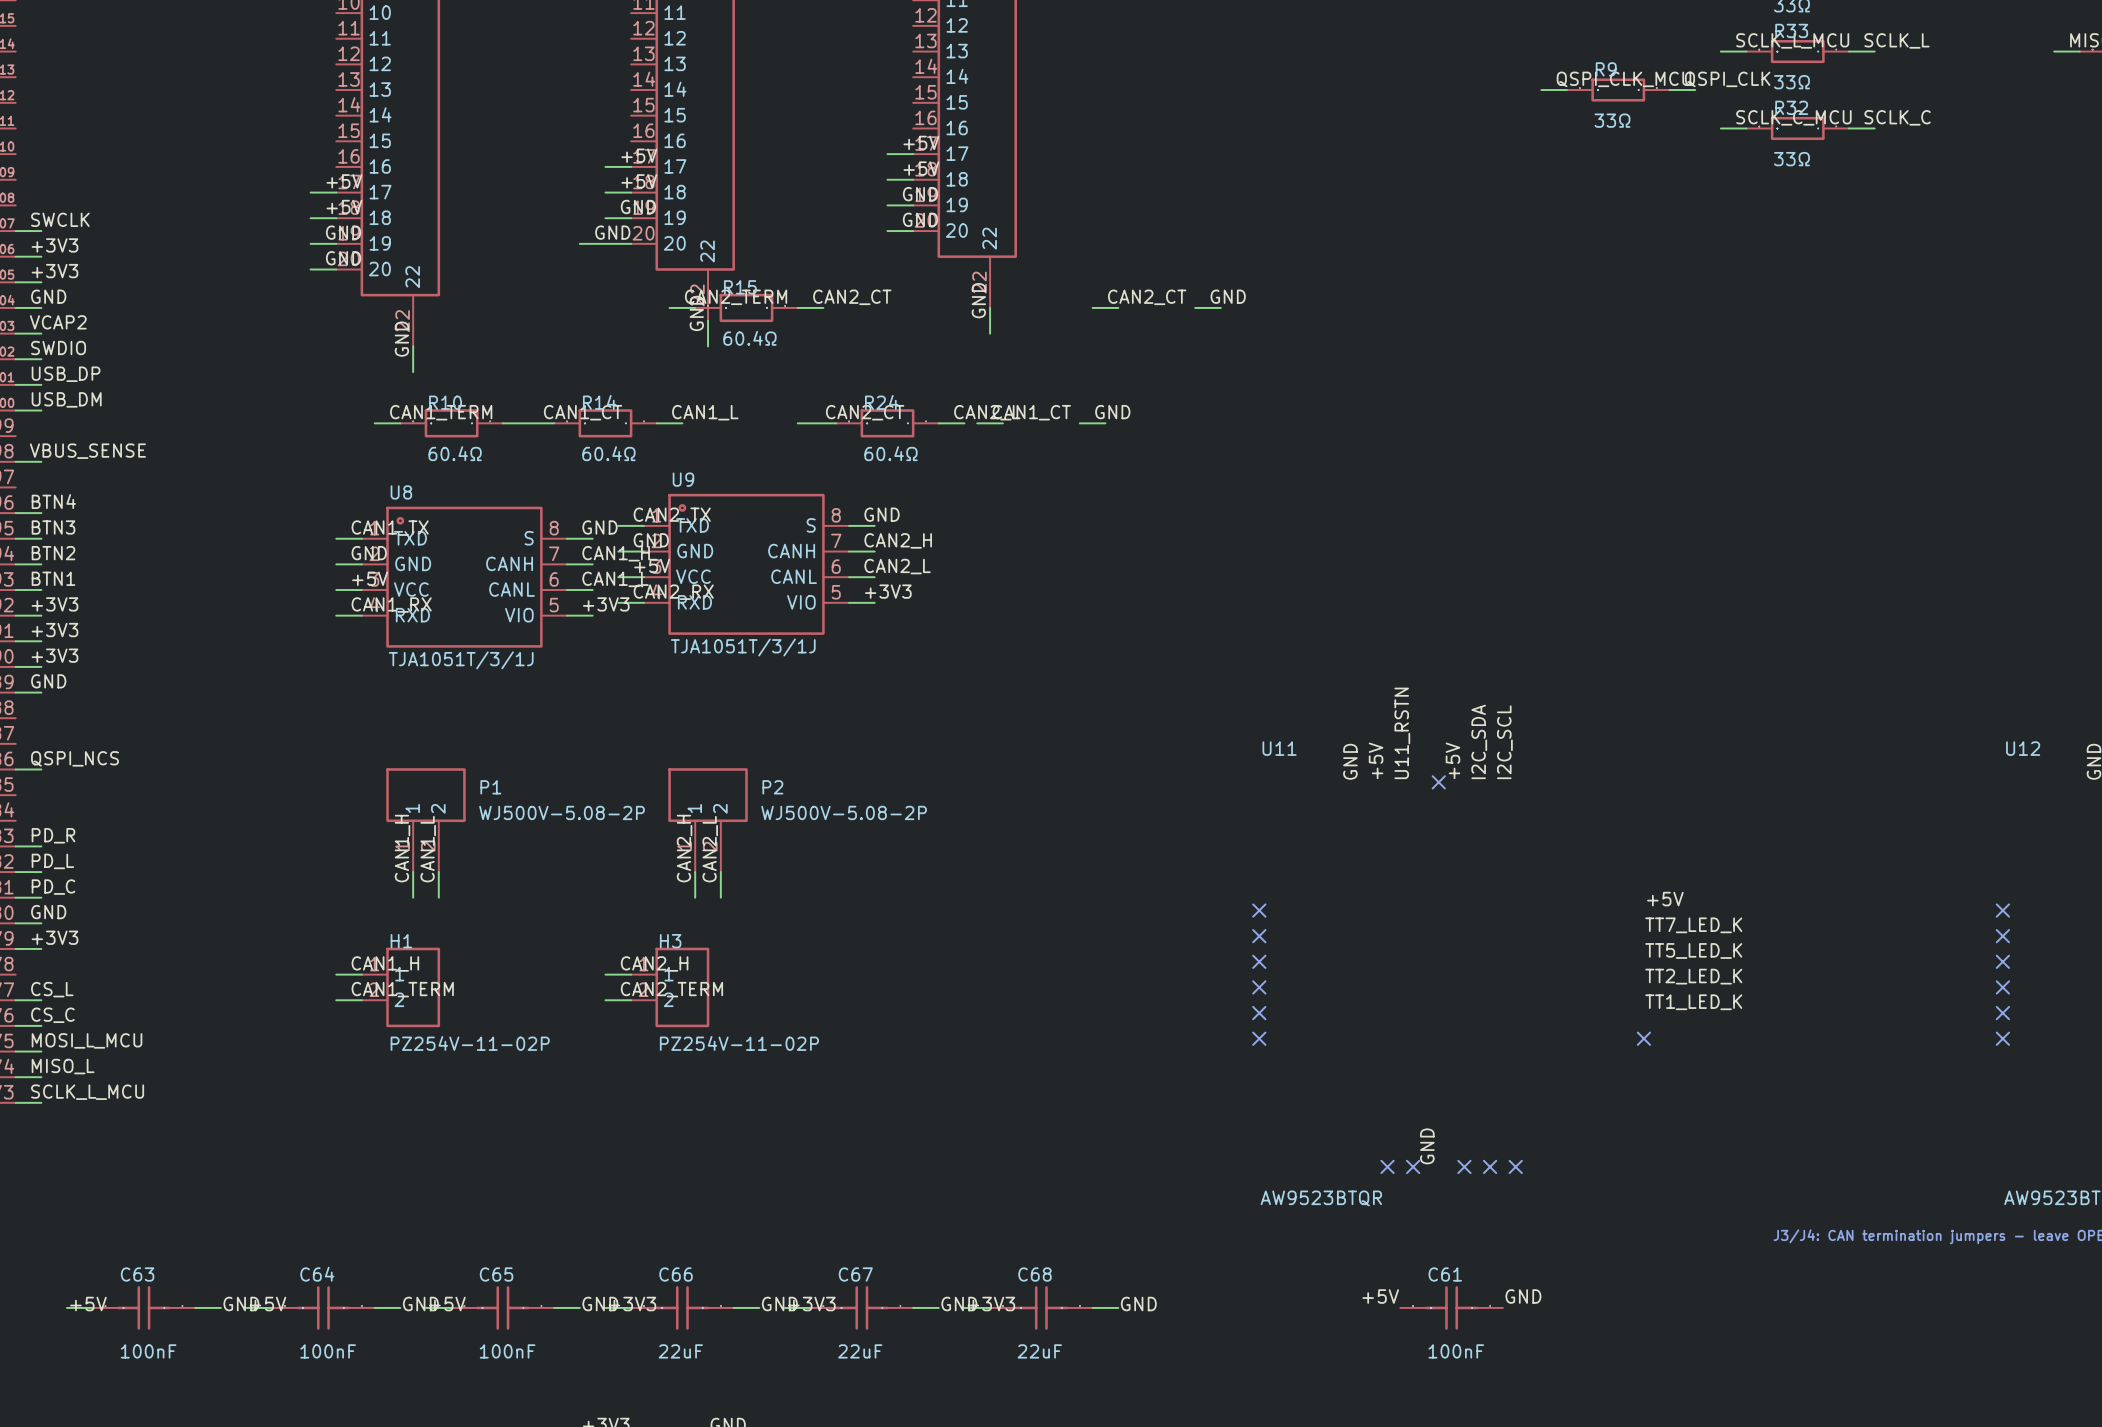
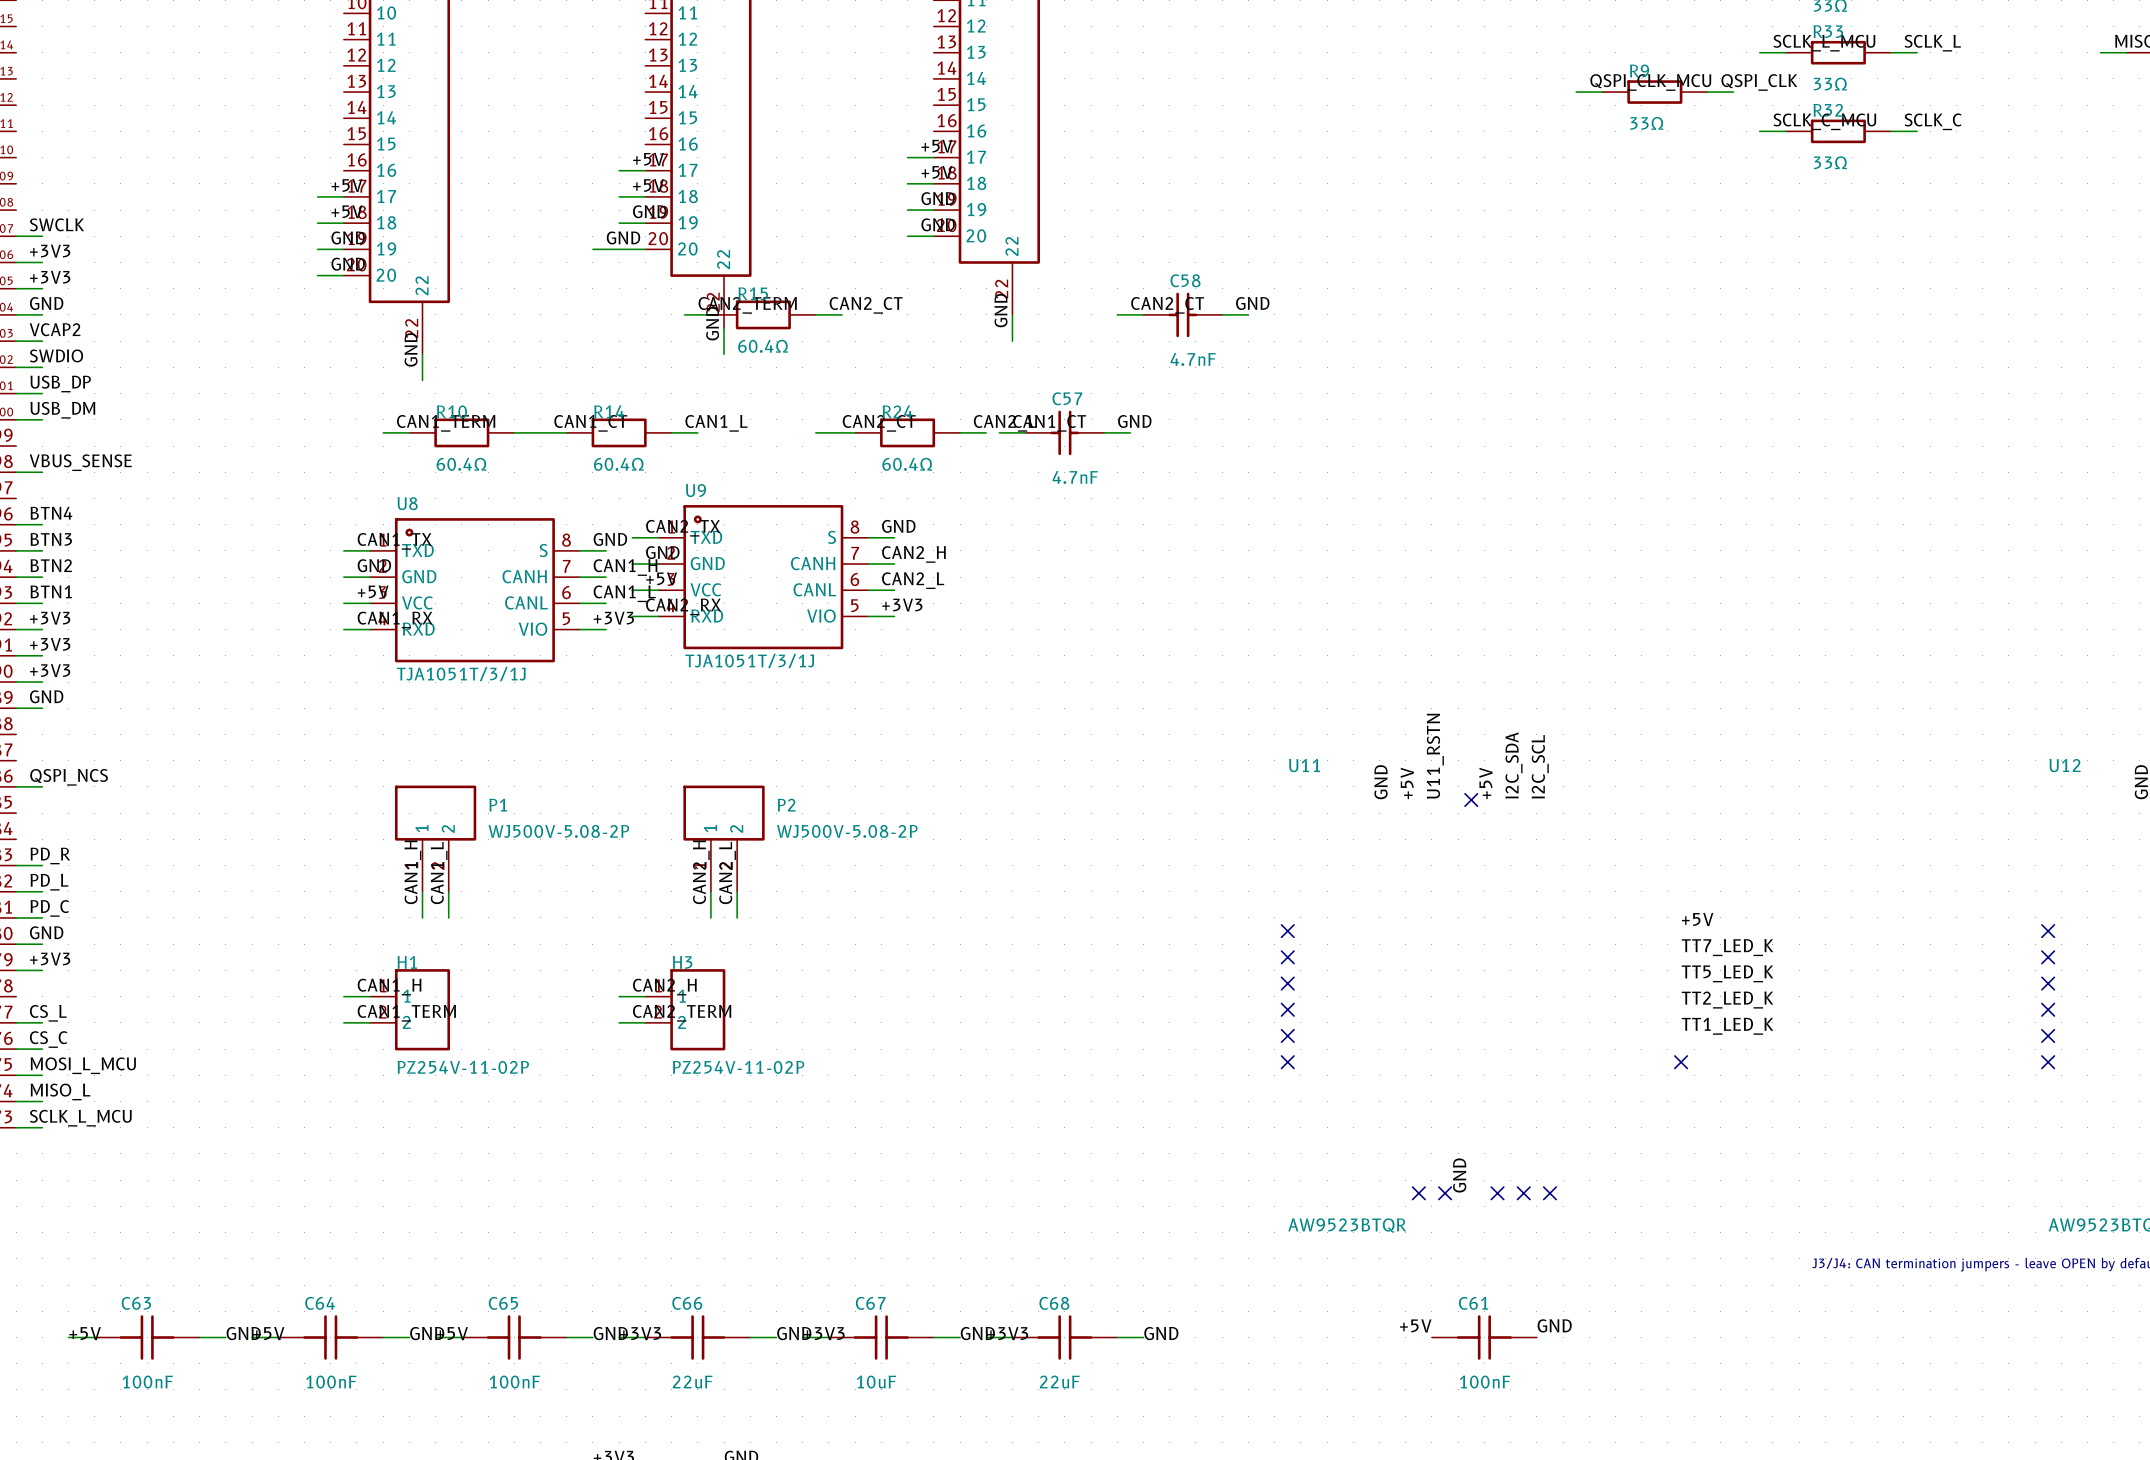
C58: none -> 4.7nF (1182, 314)
C57: none -> 4.7nF (1064, 432)
C67 value: 22uF (860, 1351) -> 10uF (876, 1382)

